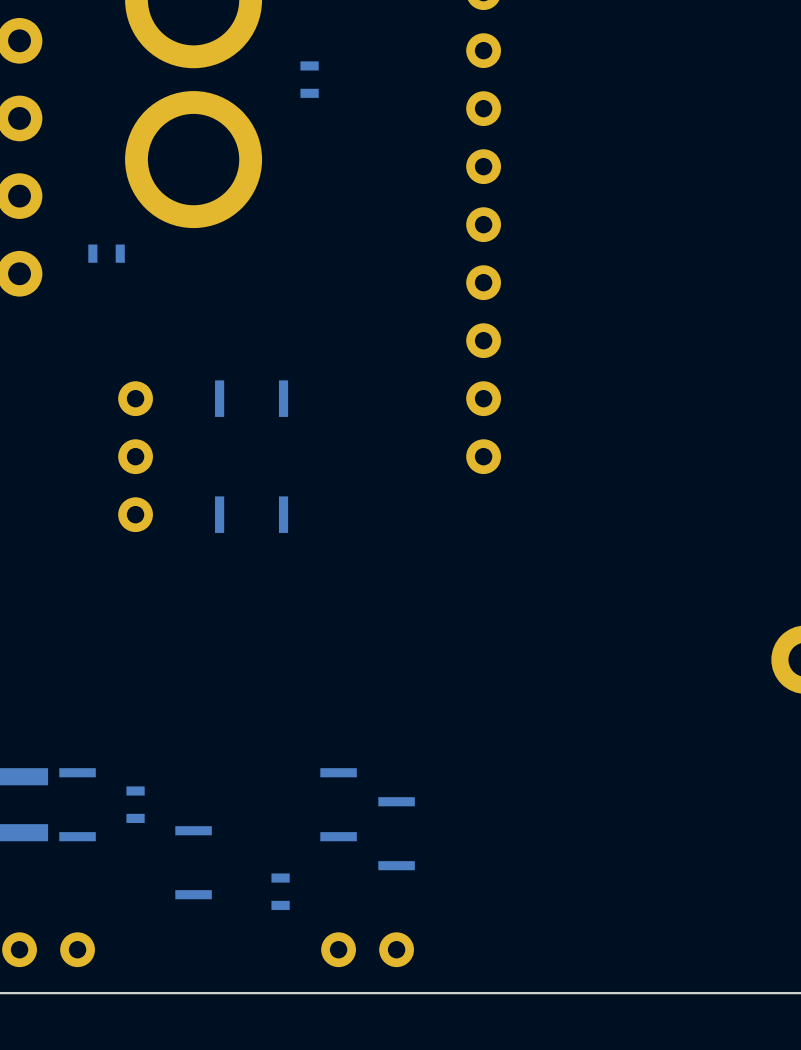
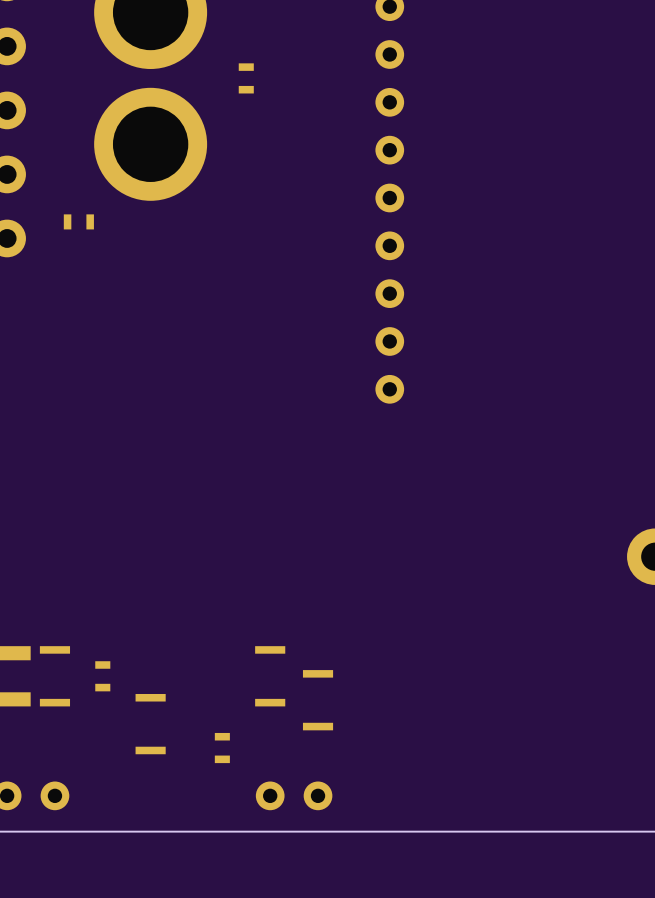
part: (251, 398) -> none
part: (135, 456) -> none
part: (251, 514) -> none

